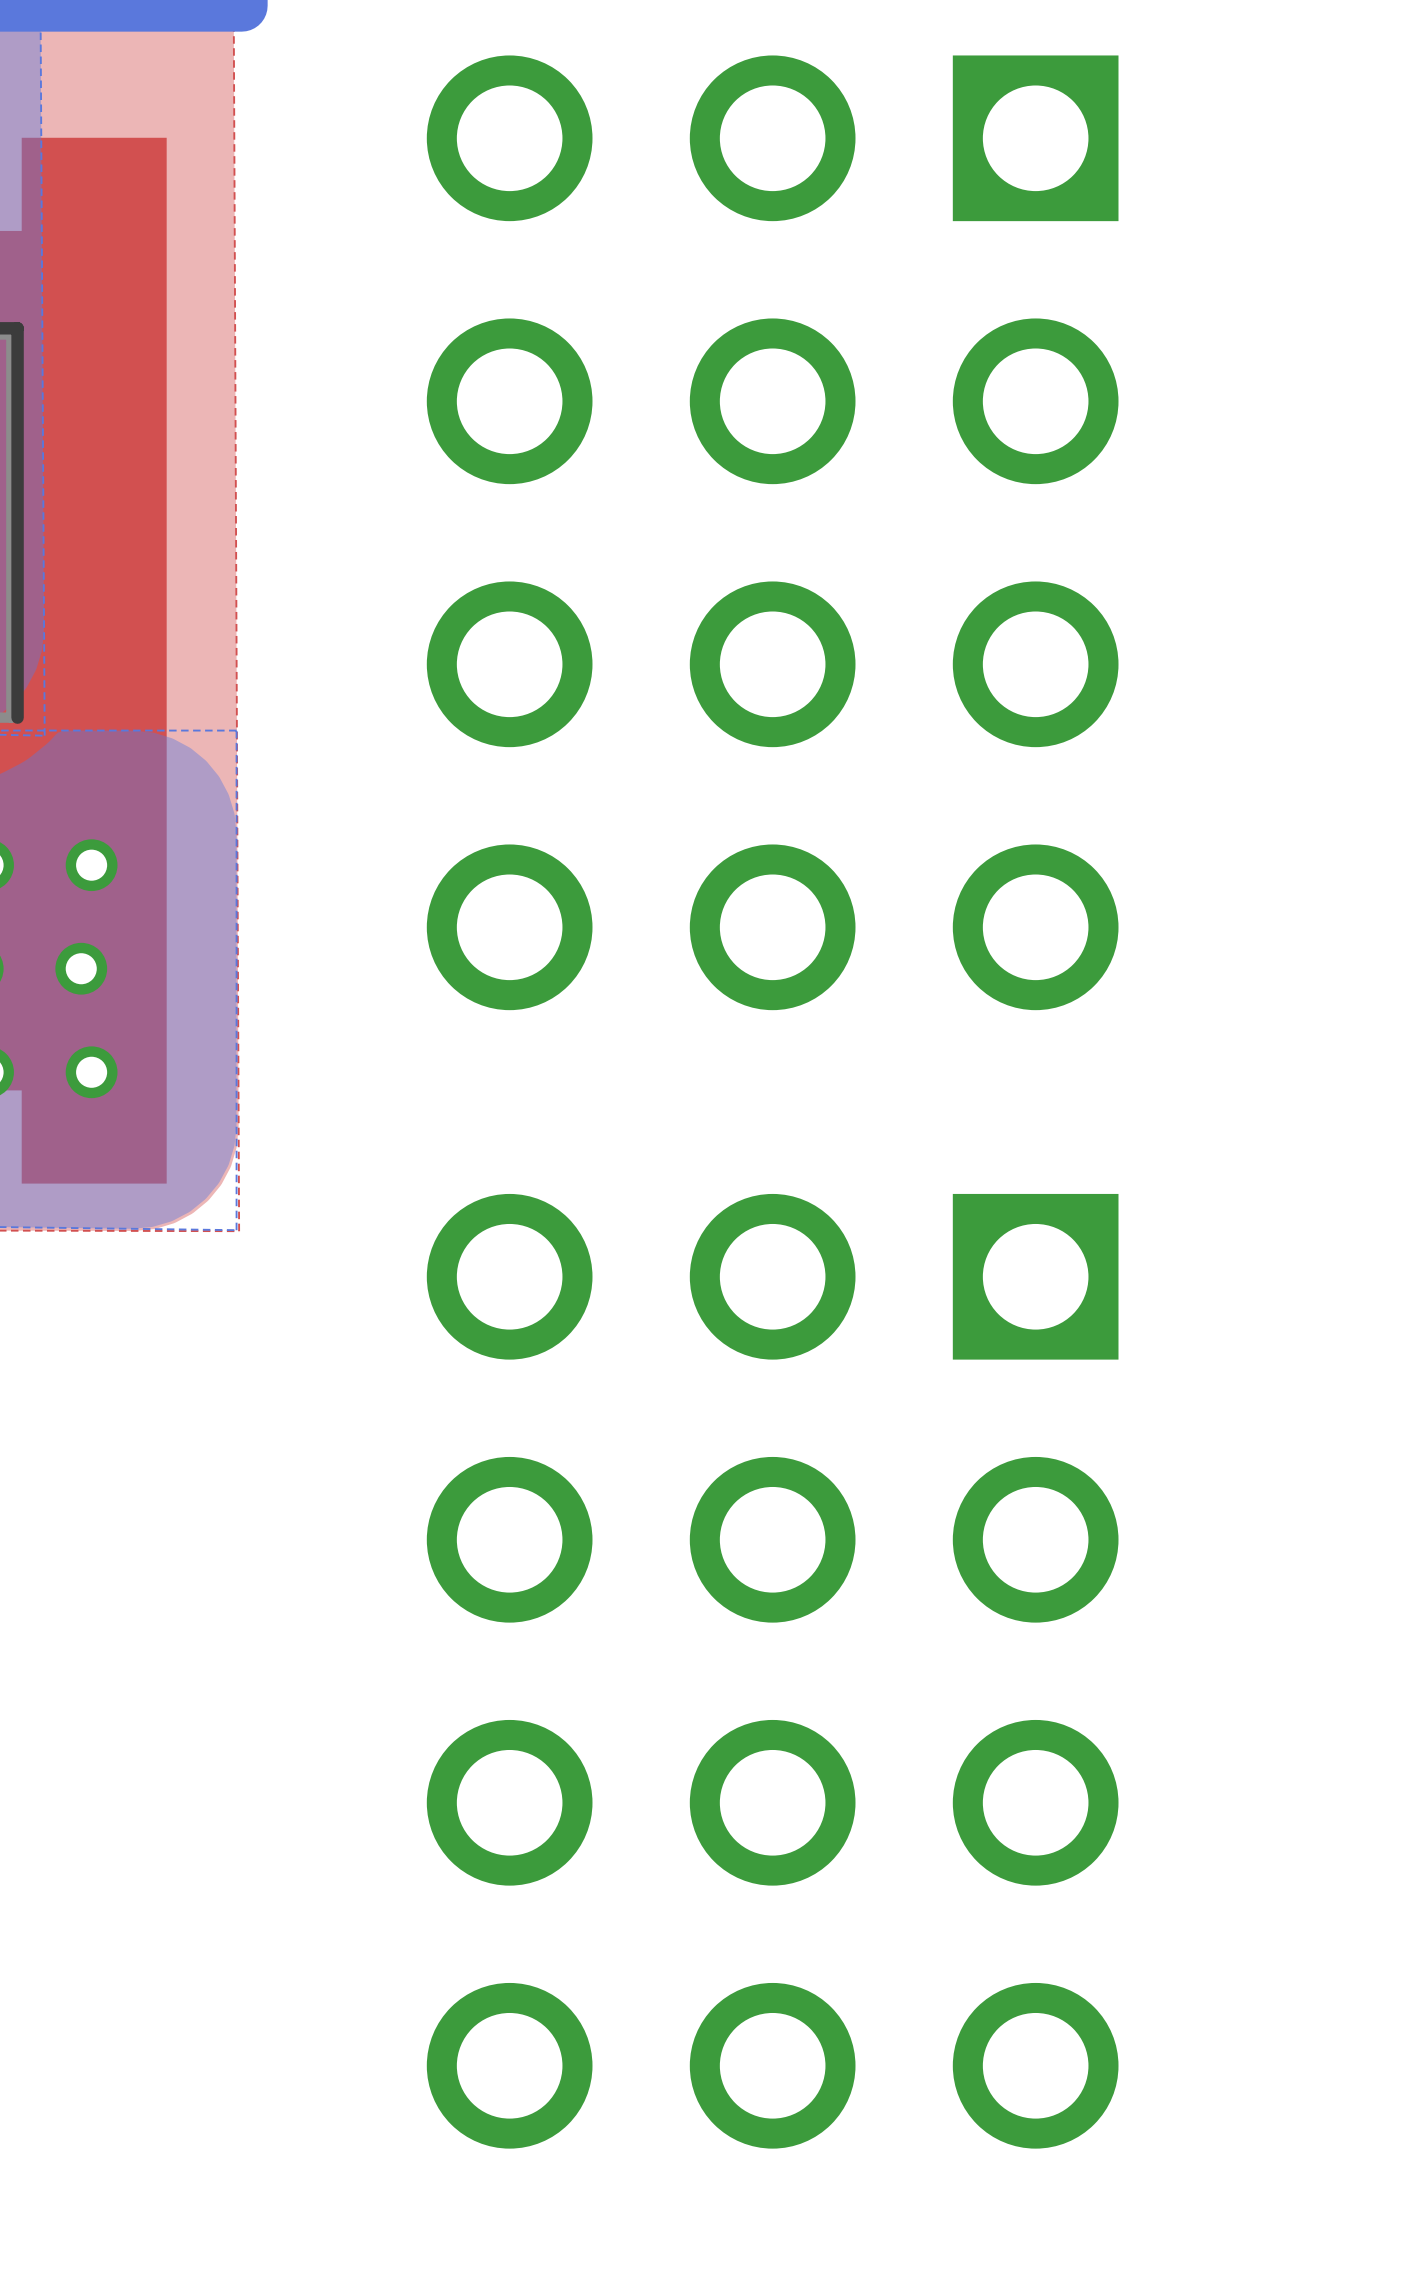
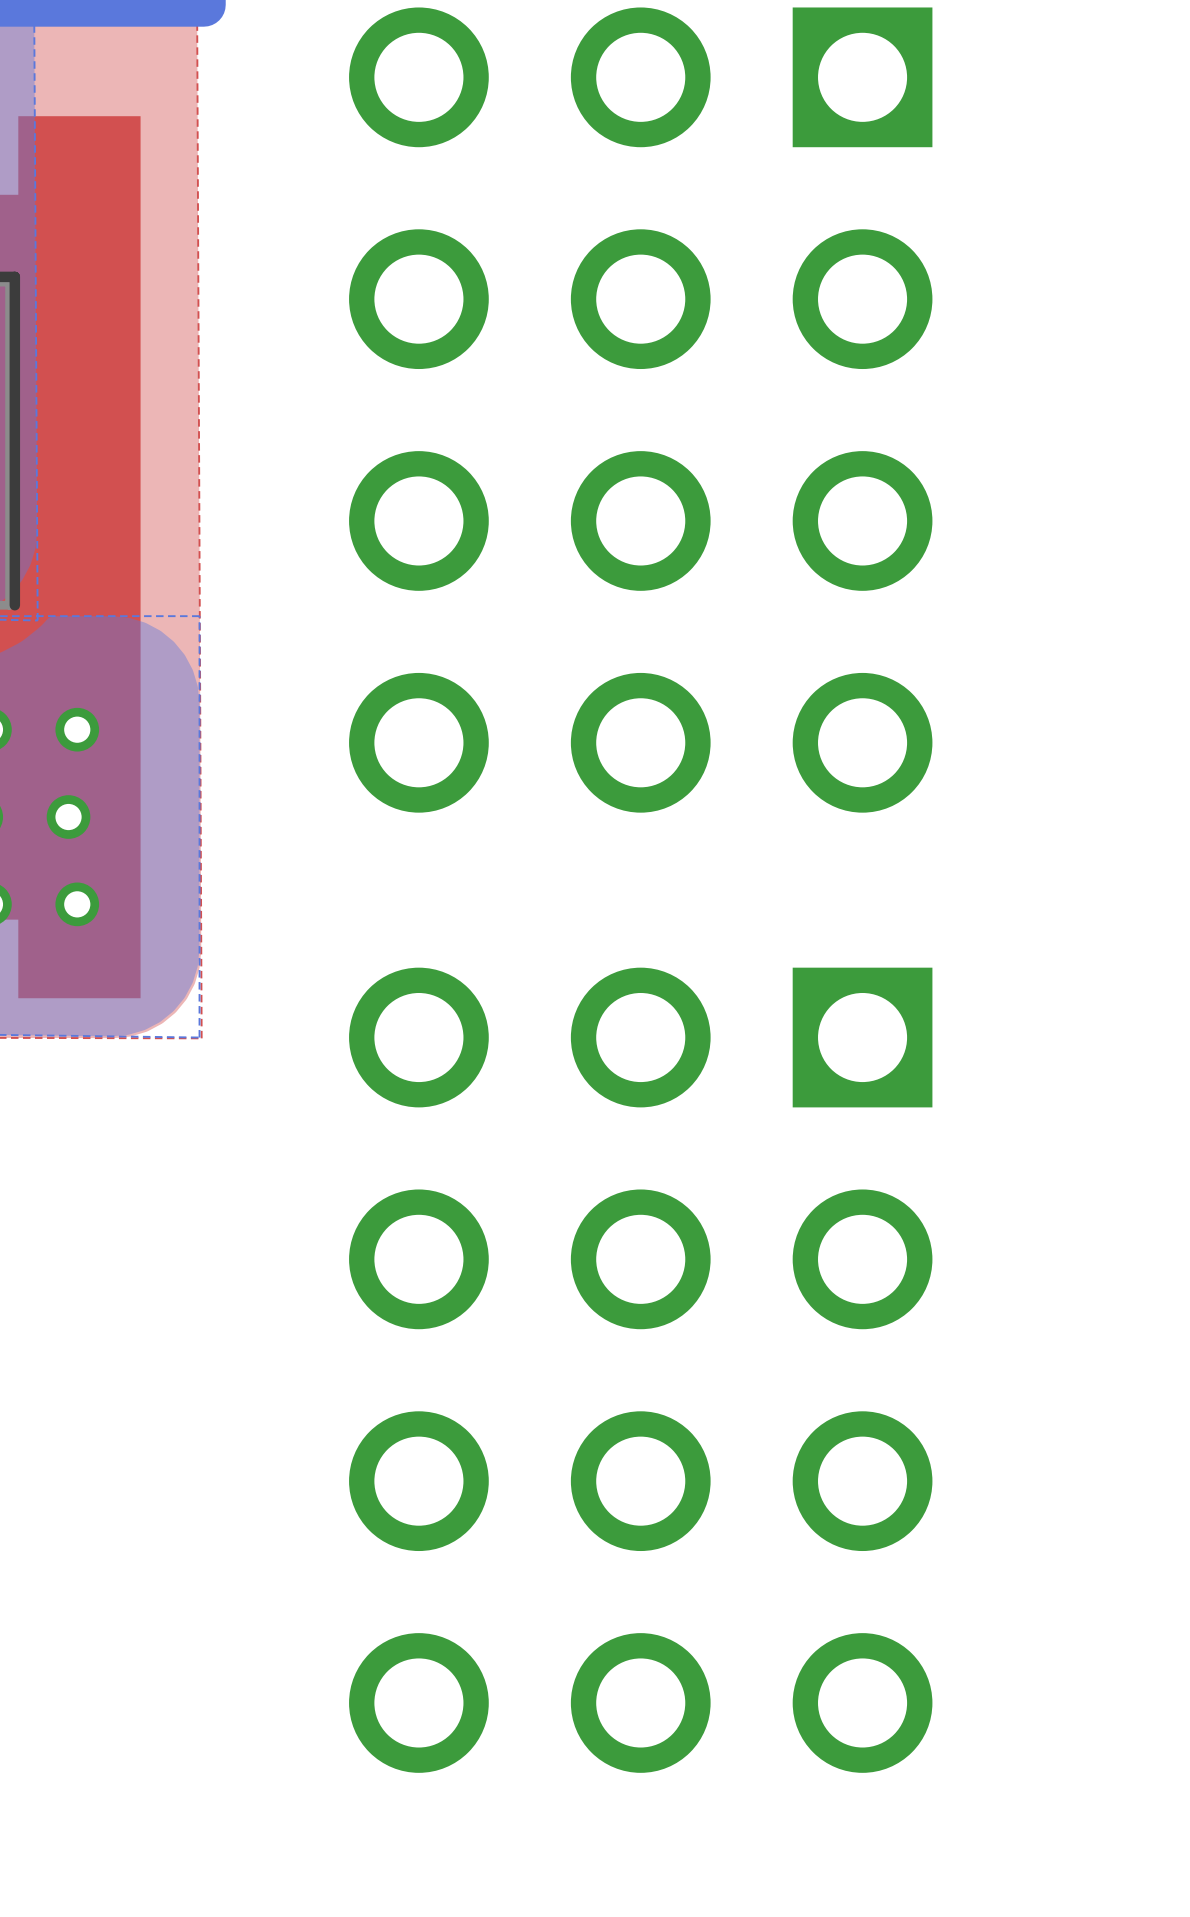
part position: (772, 532) -> (640, 410)
part position: (772, 1671) -> (640, 1370)

